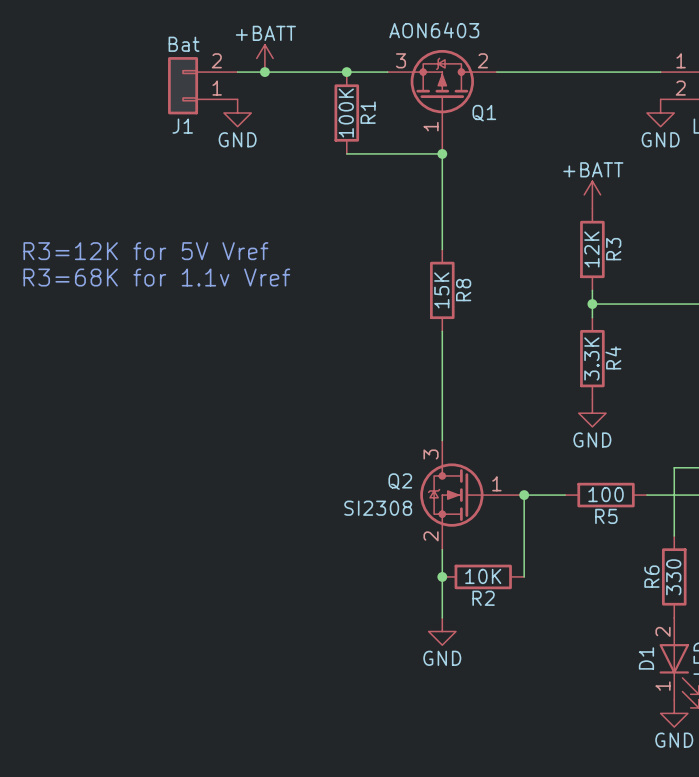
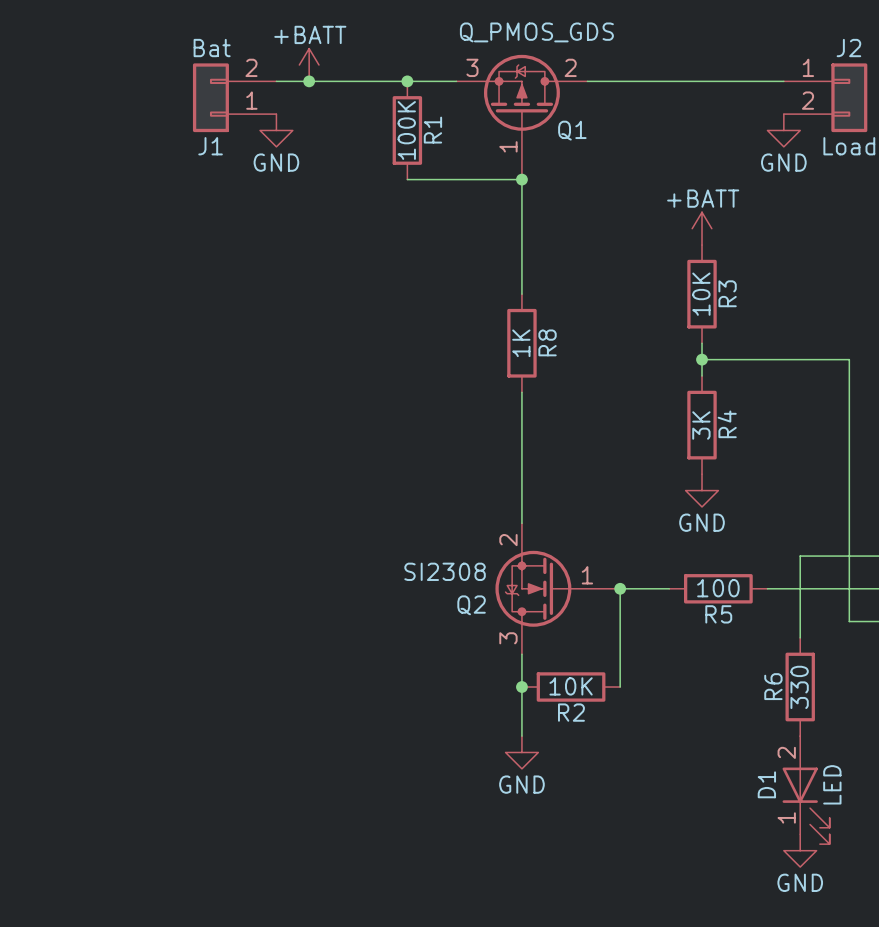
Q1 value: AON6403 (434, 30) -> Q_PMOS_GDS (536, 32)
R3 value: 12K (591, 249) -> 10K (701, 294)
text: R3=12K for 5V Vref (145, 251) -> none
text: R3=68K for 1.1v Vref (156, 277) -> none
R8 value: 15K (441, 290) -> 1K (521, 343)
R4 value: 3.3K (591, 358) -> 3K (701, 425)
Q2 flip: as is (451, 495) -> up-down (533, 588)

